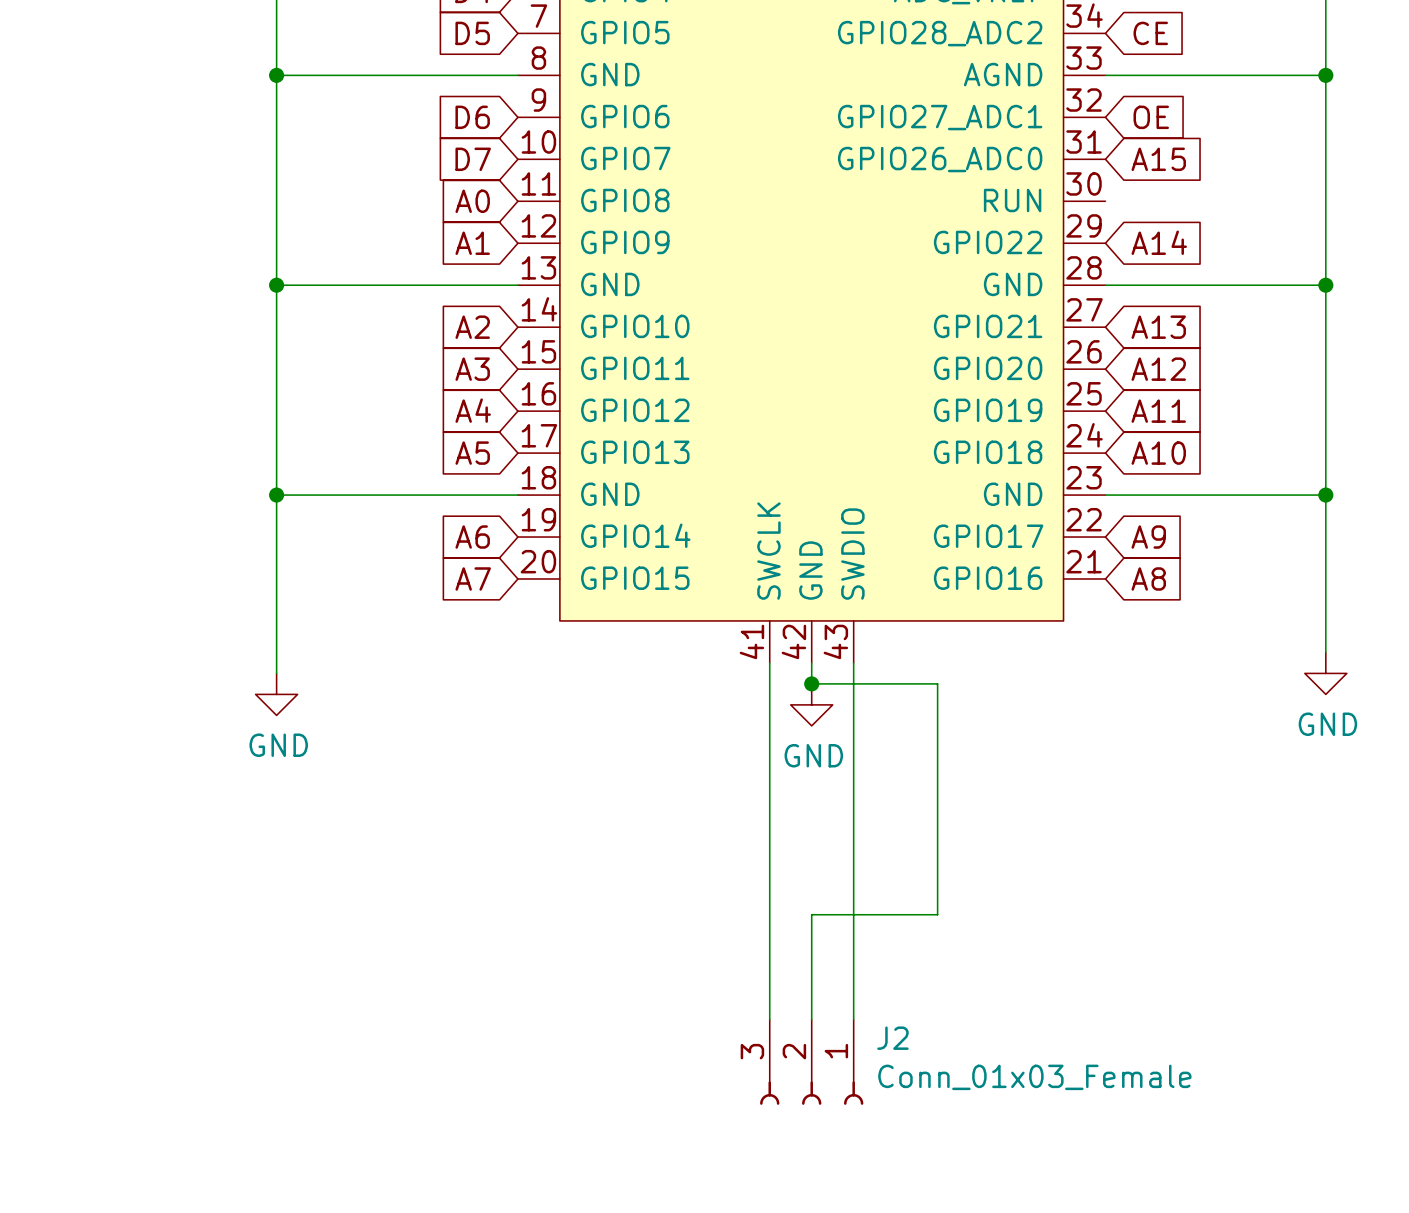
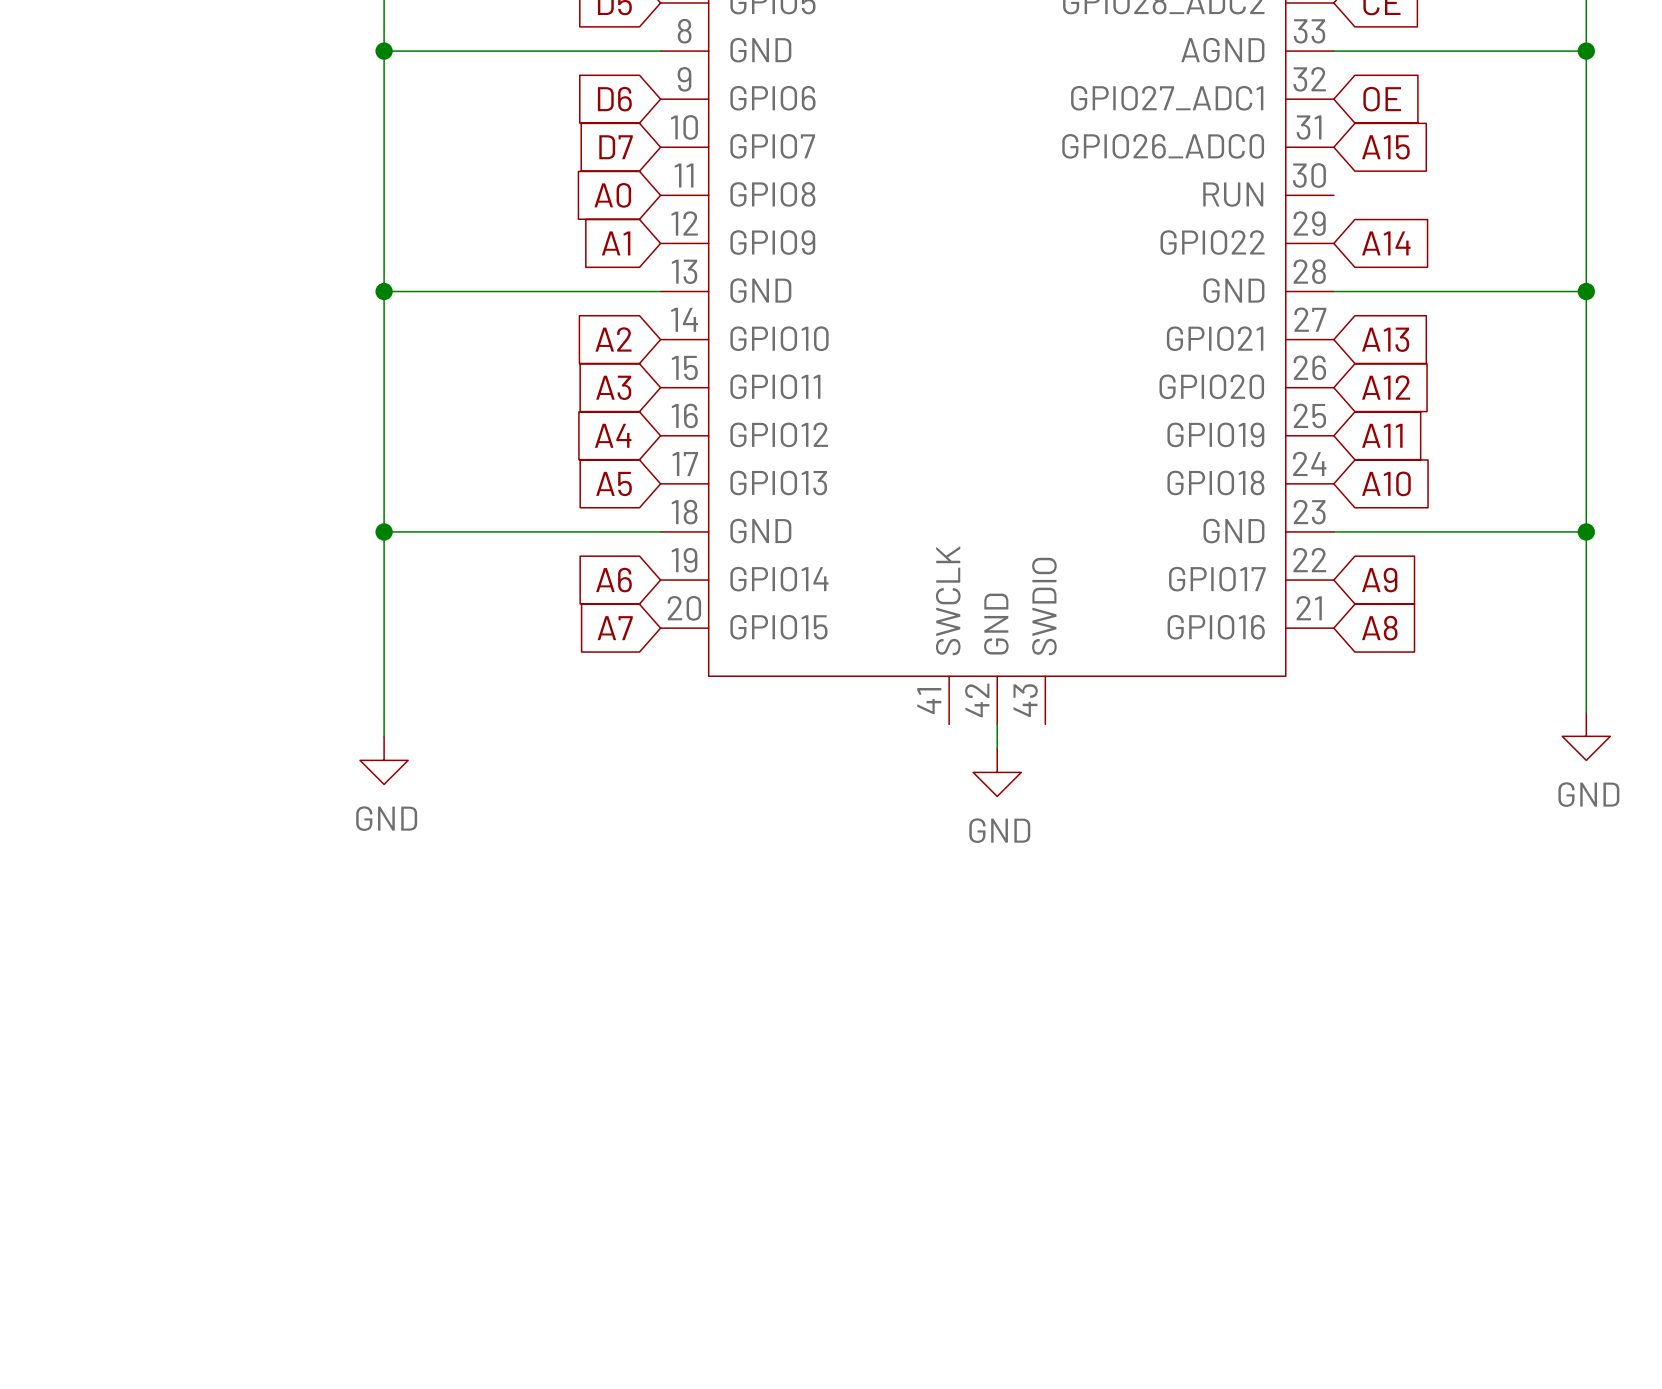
wire: (769, 662) (769, 1019) -> none
wire: (853, 662) (853, 1019) -> none
wire: (811, 683) (937, 683) (937, 914) (811, 914) (811, 1019) -> none
junction: (811, 683) -> none
J2: Conn_01x03_Female (811, 1062) -> none

